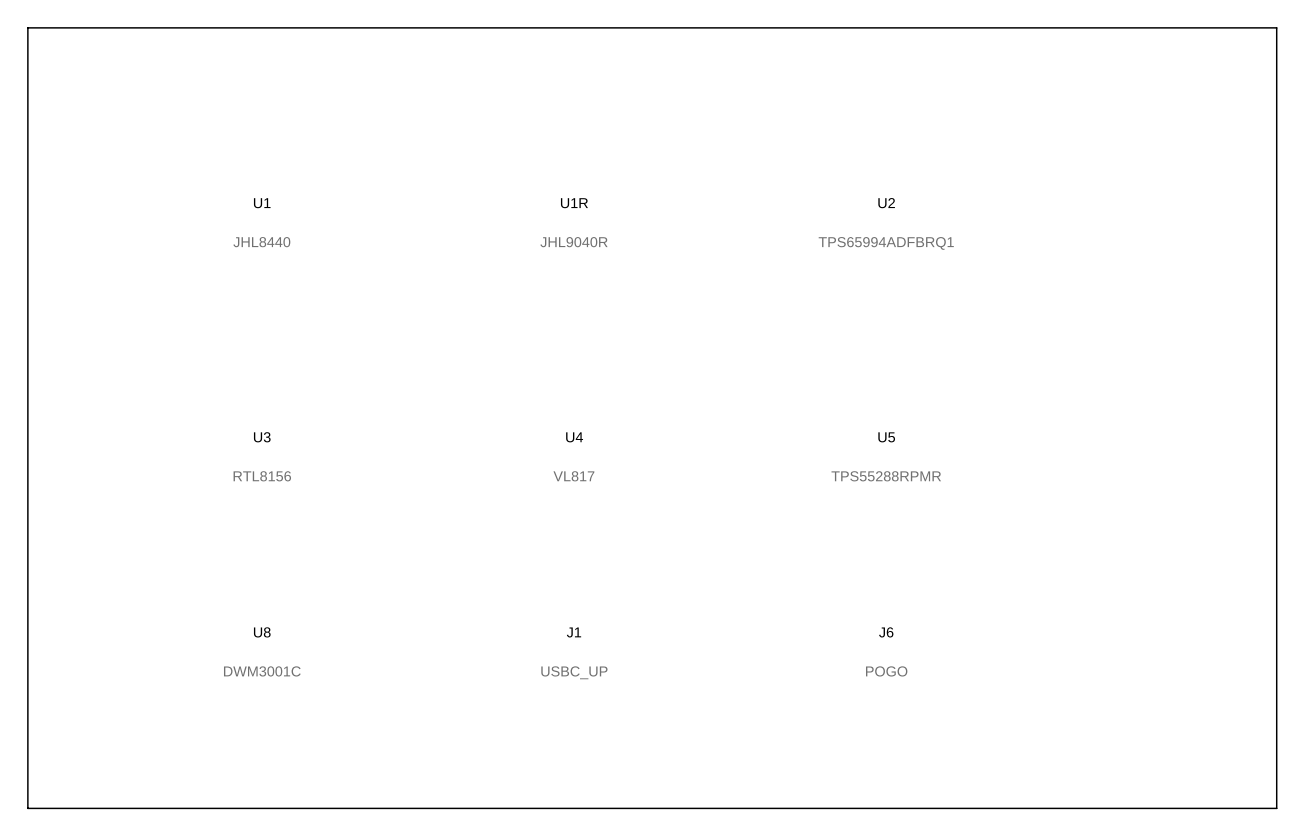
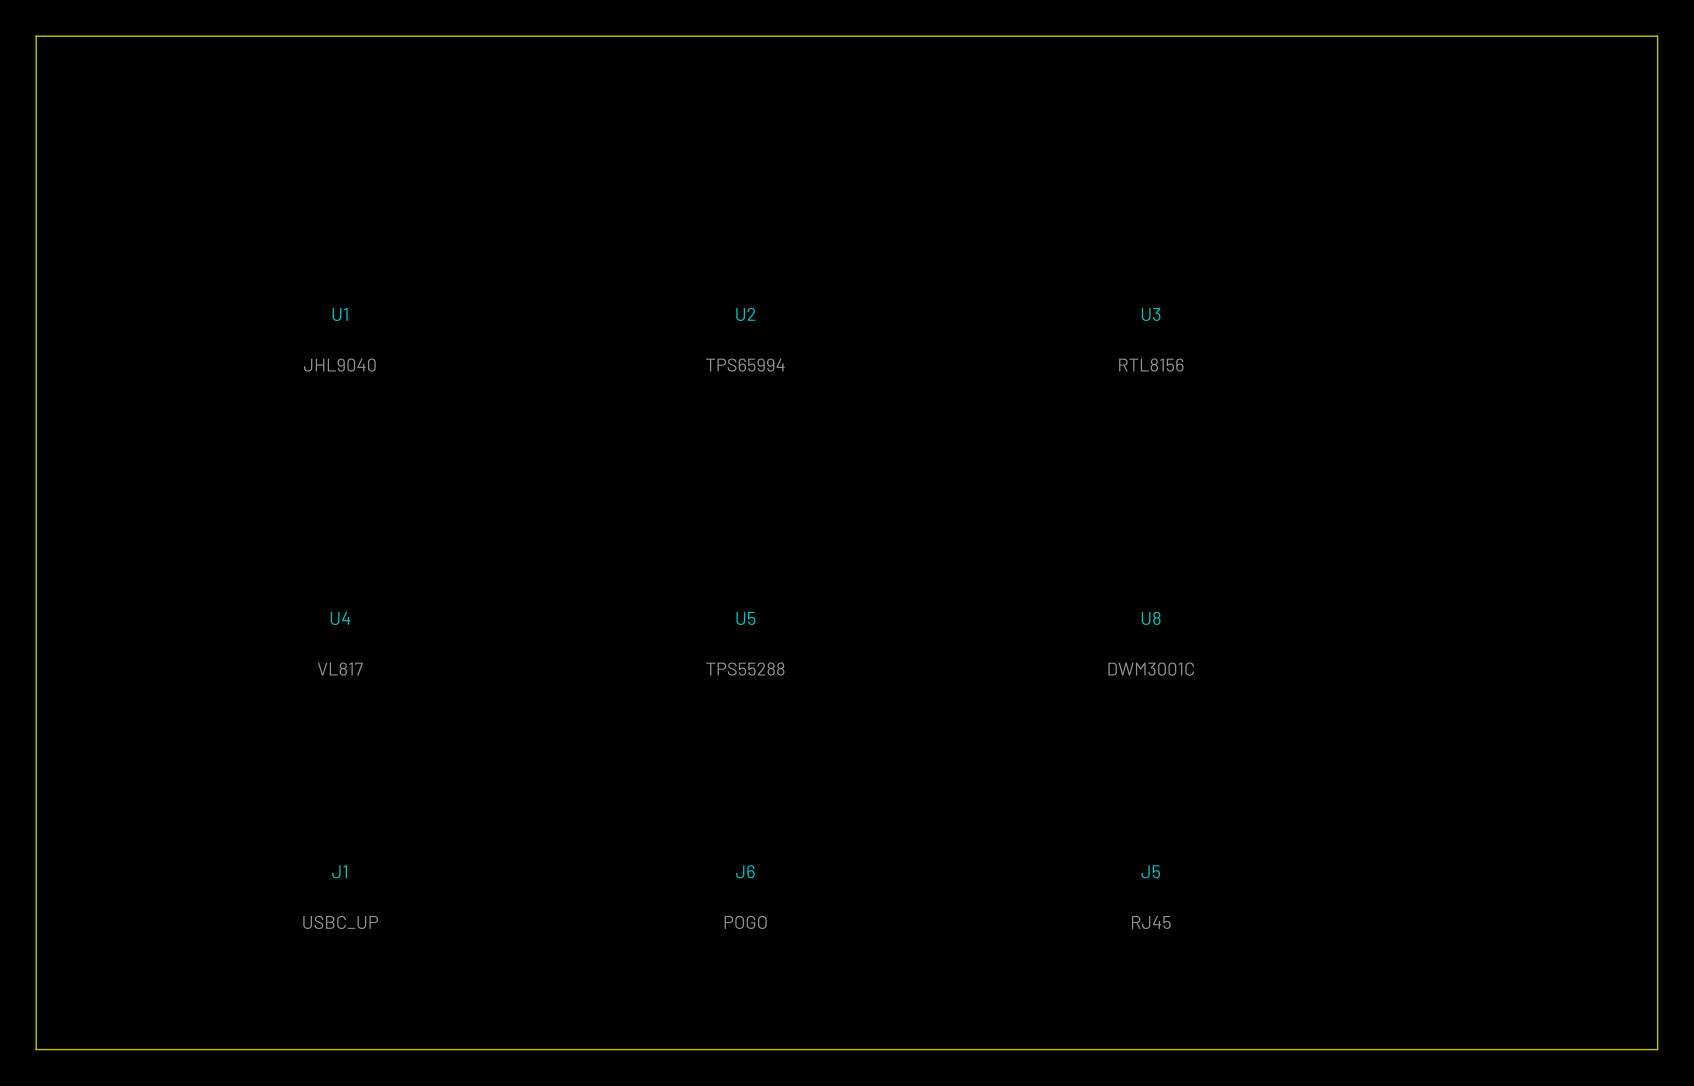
U1 position: (261, 222) -> (339, 339)
U1R: JHL9040R (574, 222) -> none
U2 position: (886, 223) -> (745, 339)
U1 value: JHL8440 (261, 242) -> JHL9040 (339, 365)
U2 value: TPS65994ADFBRQ1 (886, 243) -> TPS65994 (745, 365)
U3 position: (262, 456) -> (1151, 339)
U4 position: (573, 456) -> (340, 643)
U5 position: (886, 456) -> (745, 643)
U5 value: TPS55288RPMR (886, 476) -> TPS55288 (745, 669)
U8 position: (262, 651) -> (1151, 643)
J6 position: (886, 651) -> (745, 897)
J1 position: (574, 653) -> (340, 897)
J5: none -> RJ45 (1151, 897)

